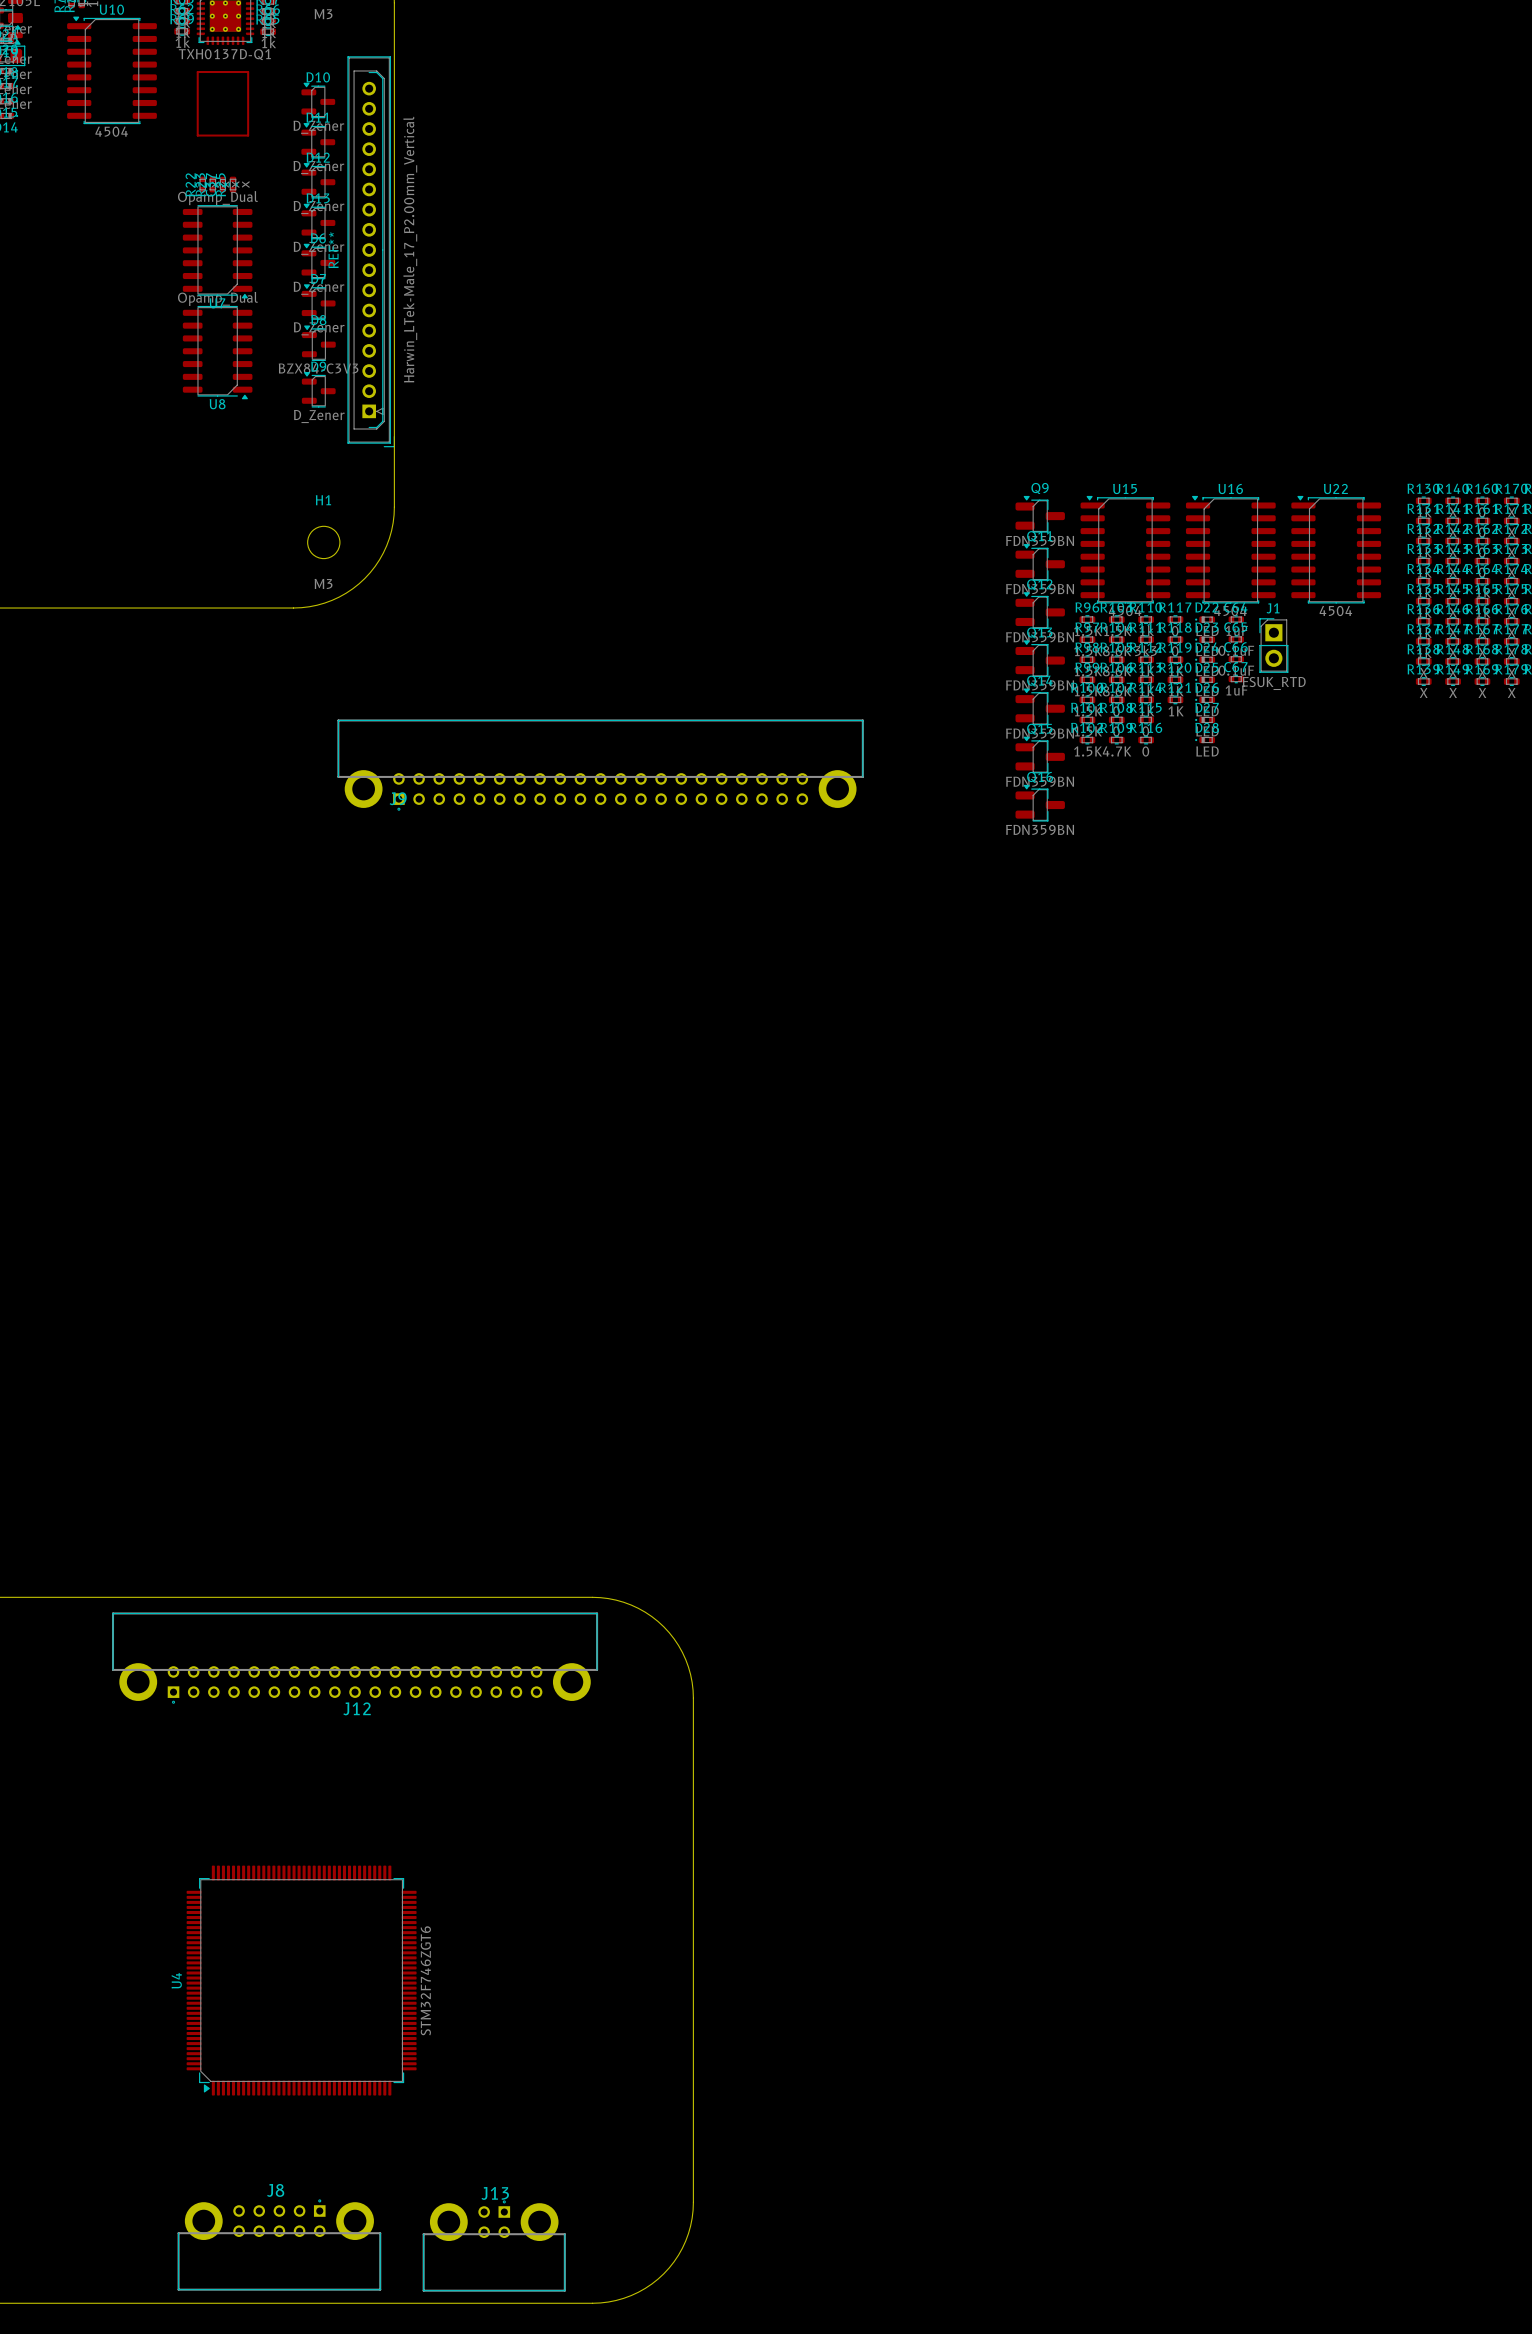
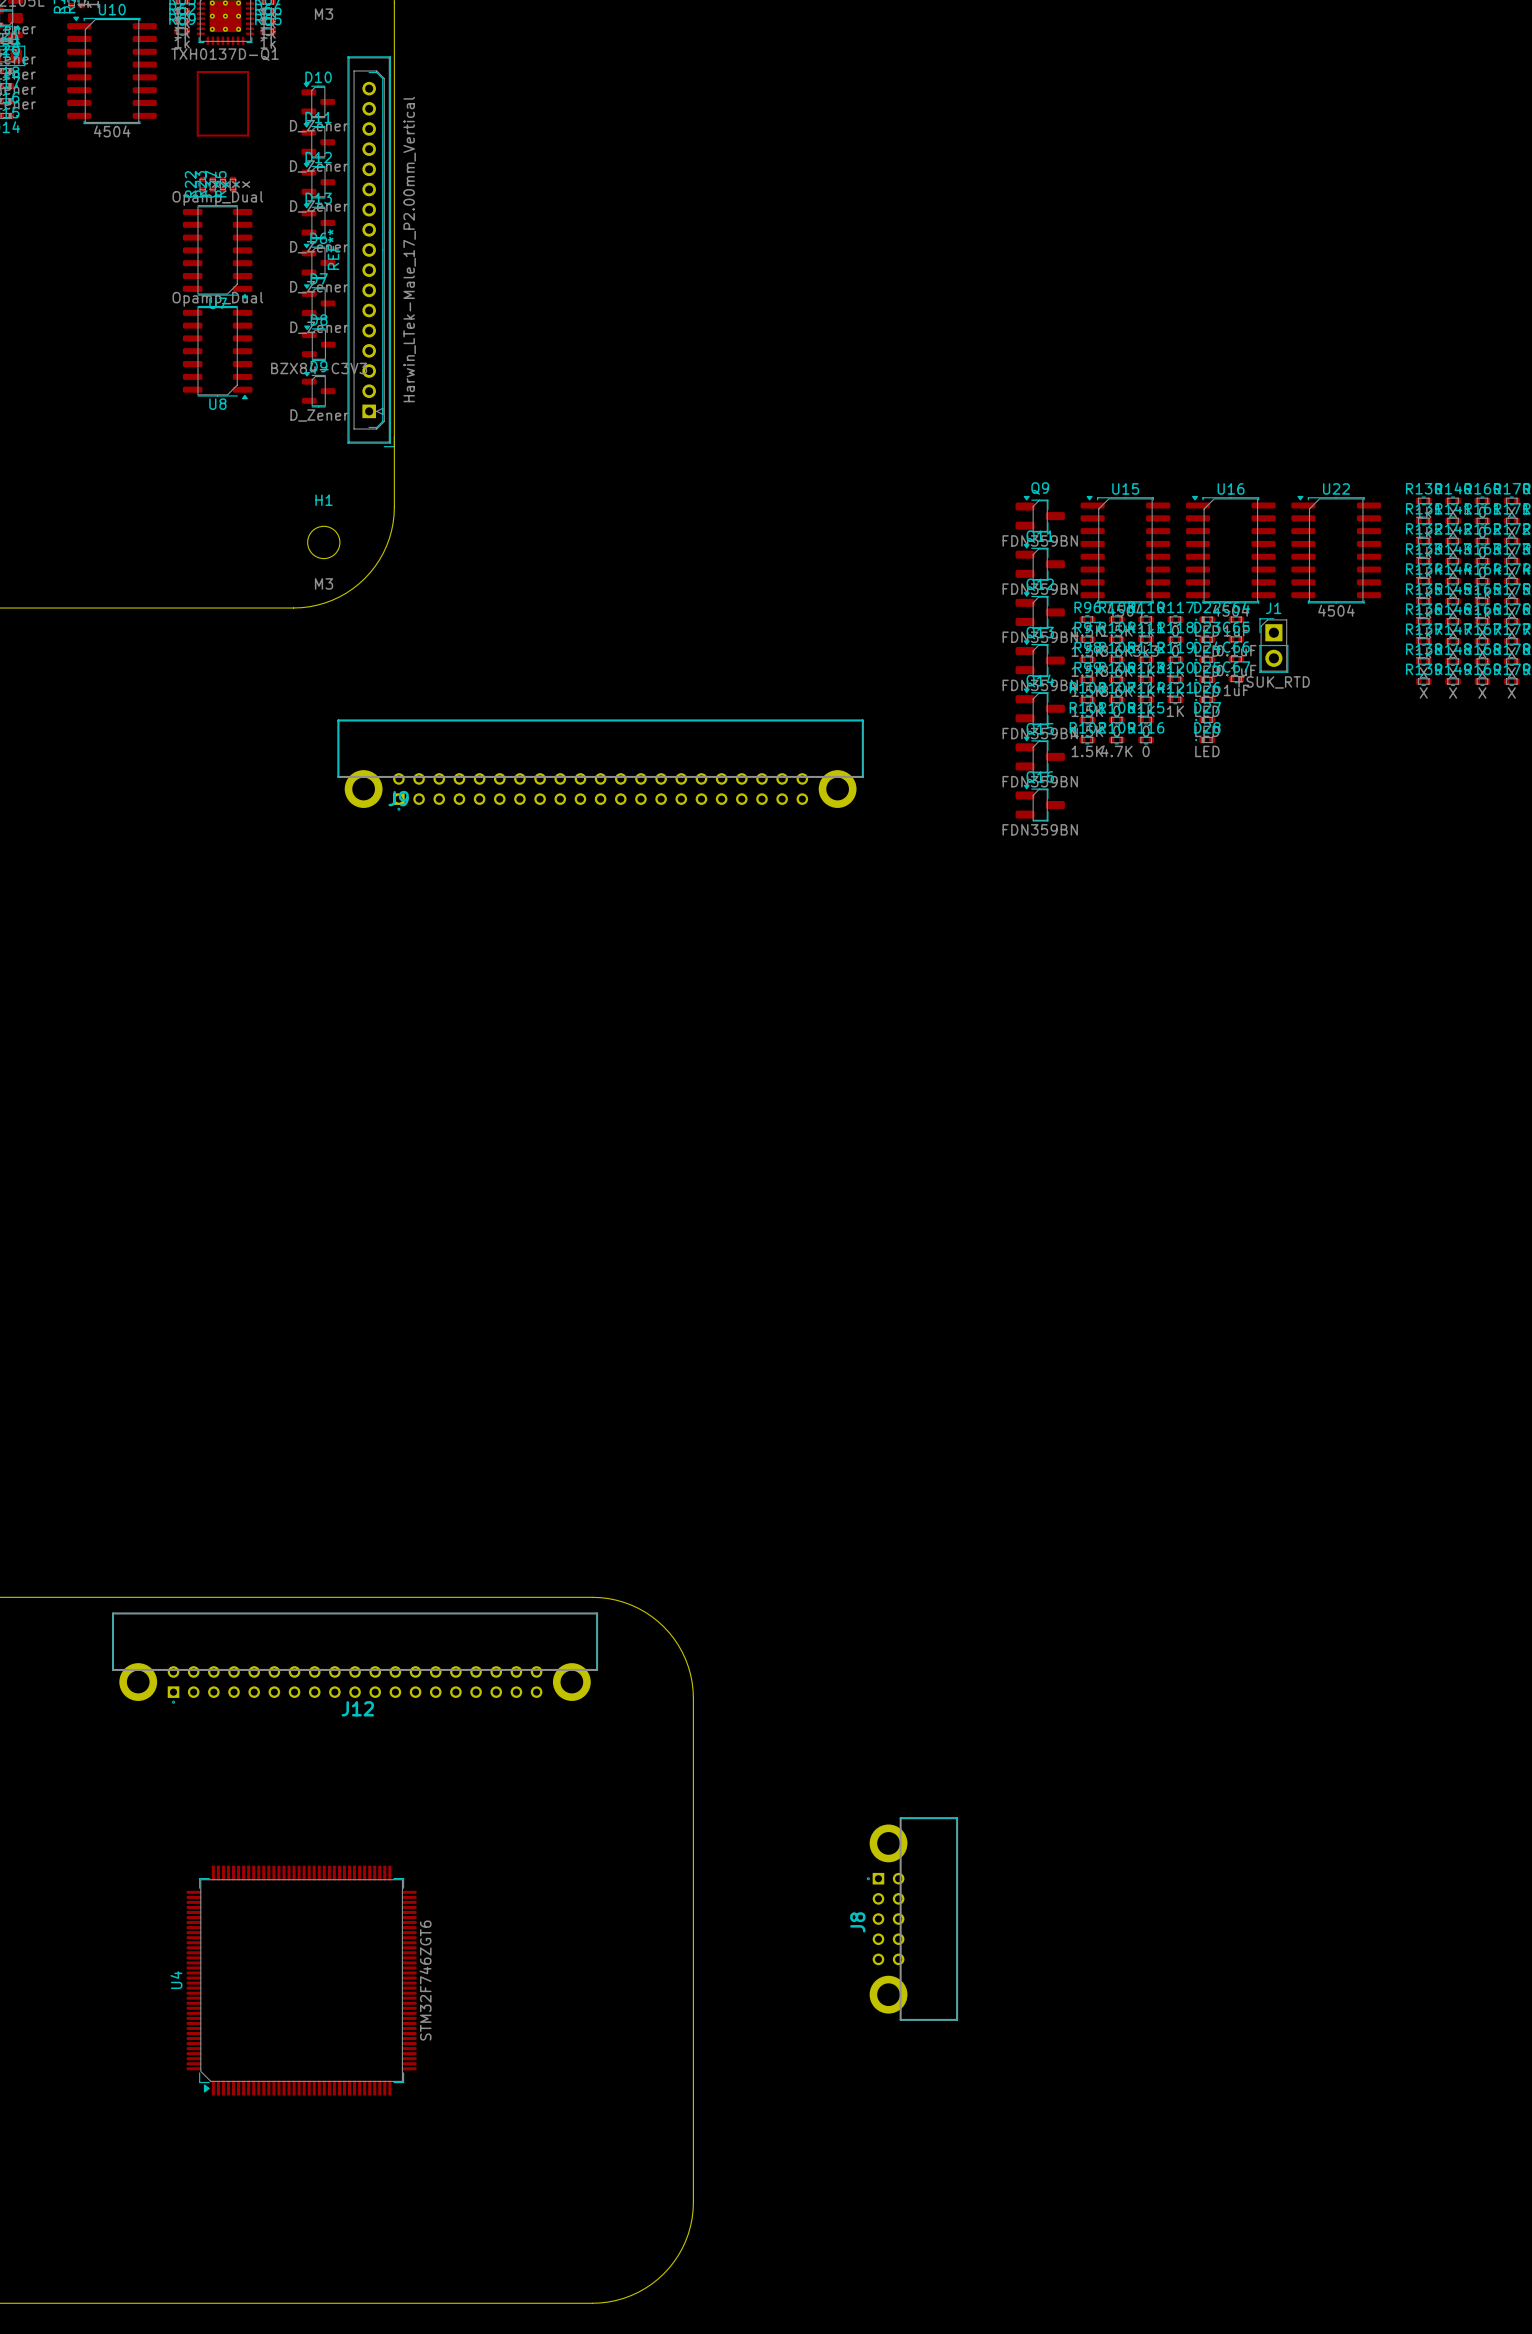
J8 rotation: 0° (279, 2245) -> 90° counterclockwise (912, 1919)
J8 position: (279, 2245) -> (912, 1919)
J13: (494, 2246) -> none

